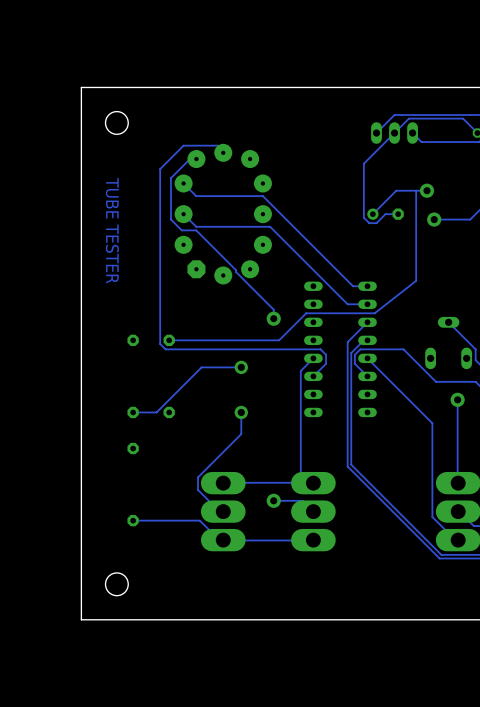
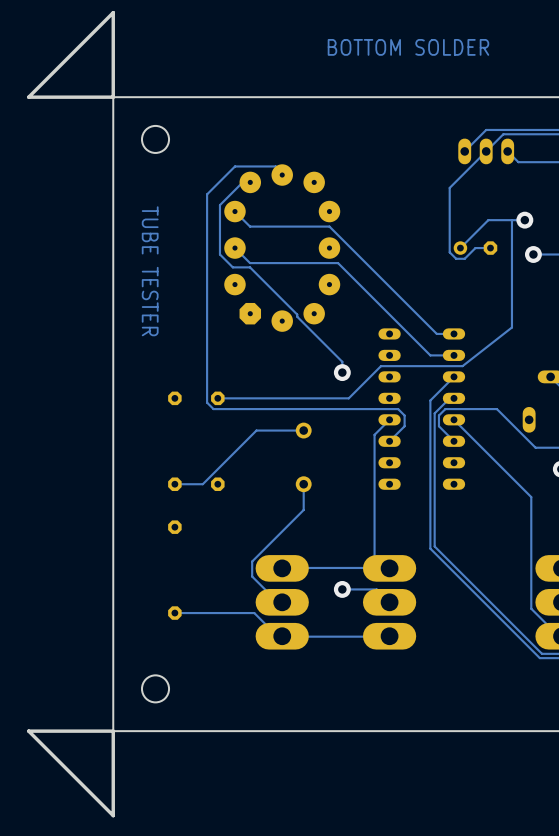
board edge: none -> (113, 12) (113, 97) (28, 97) (113, 12)
text: none -> BOTTOM SOLDER (408, 47)
board edge: none -> (113, 731) (113, 815) (28, 731) (113, 731)

